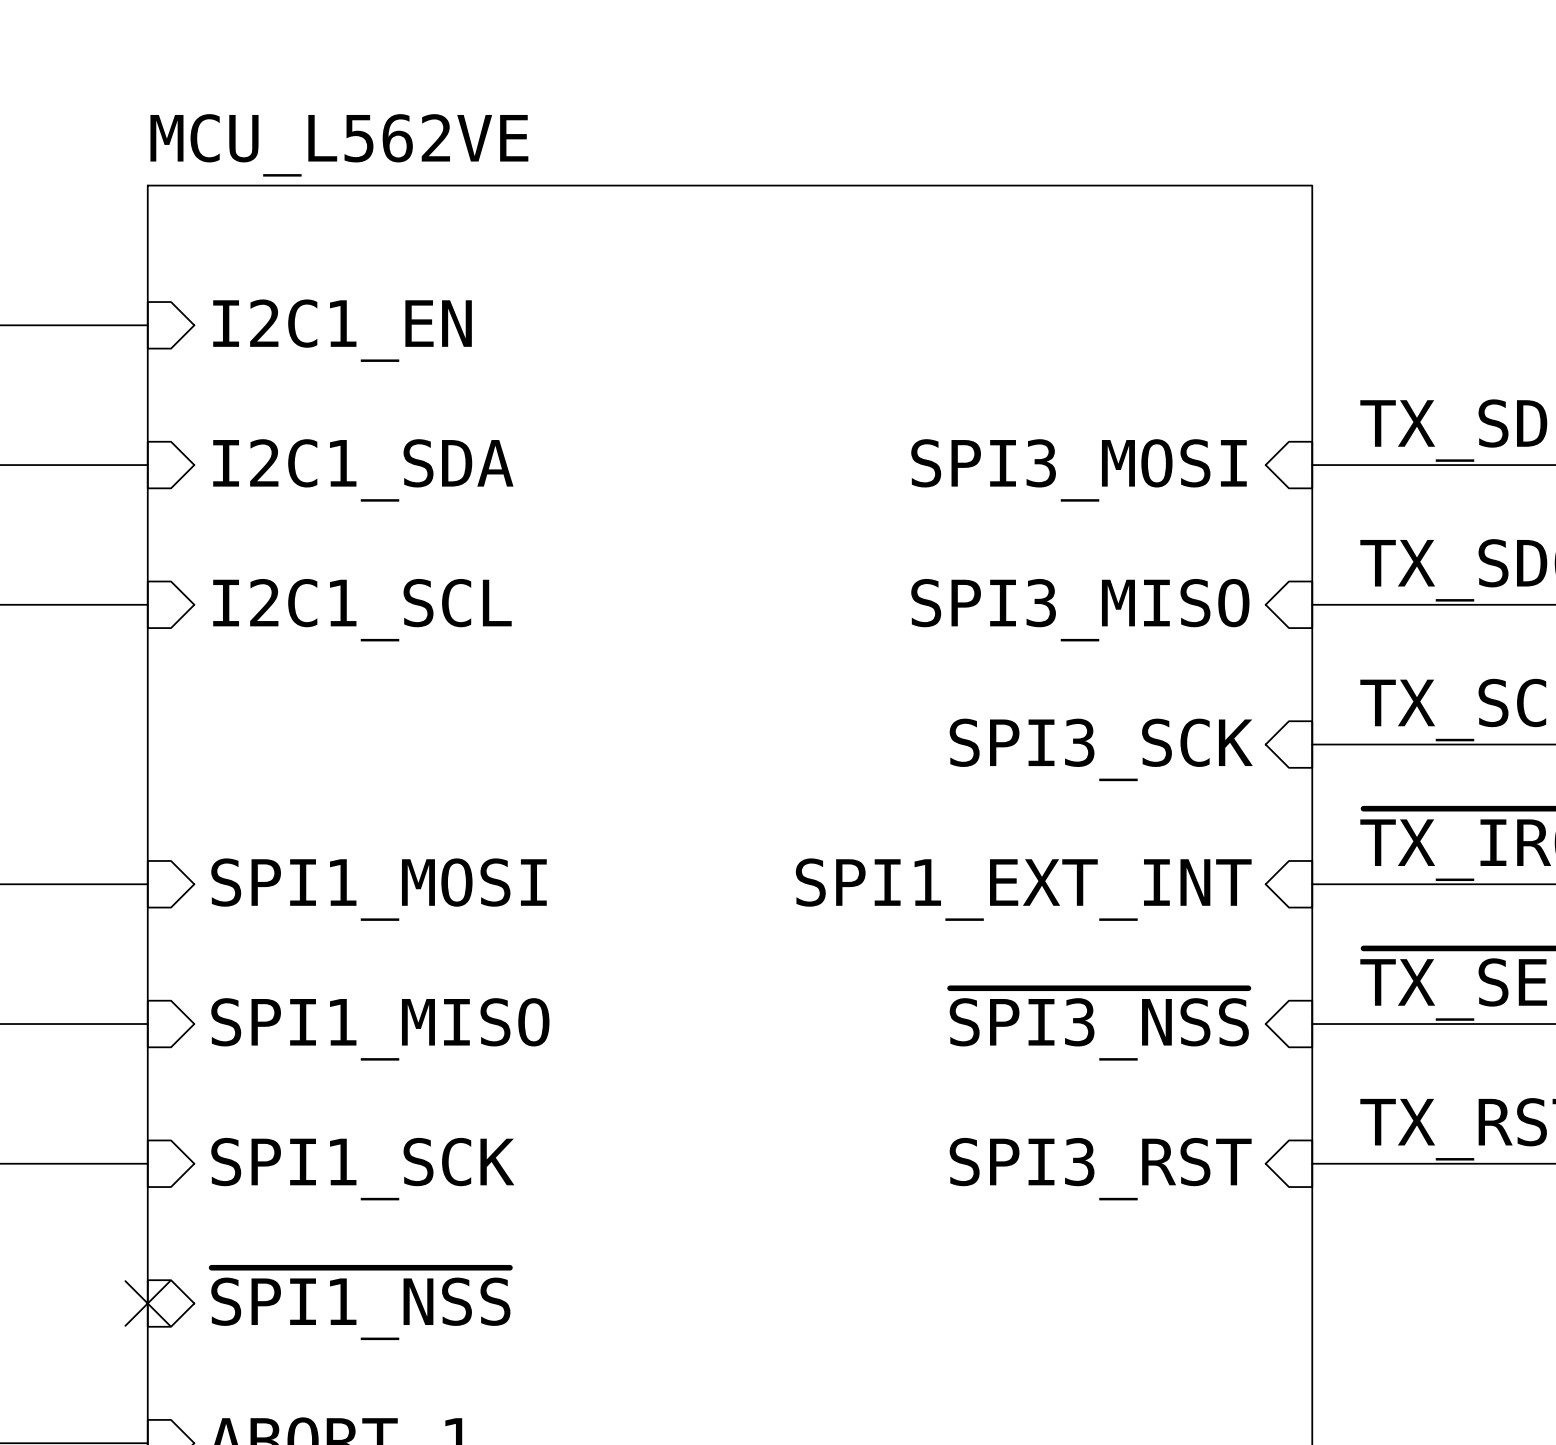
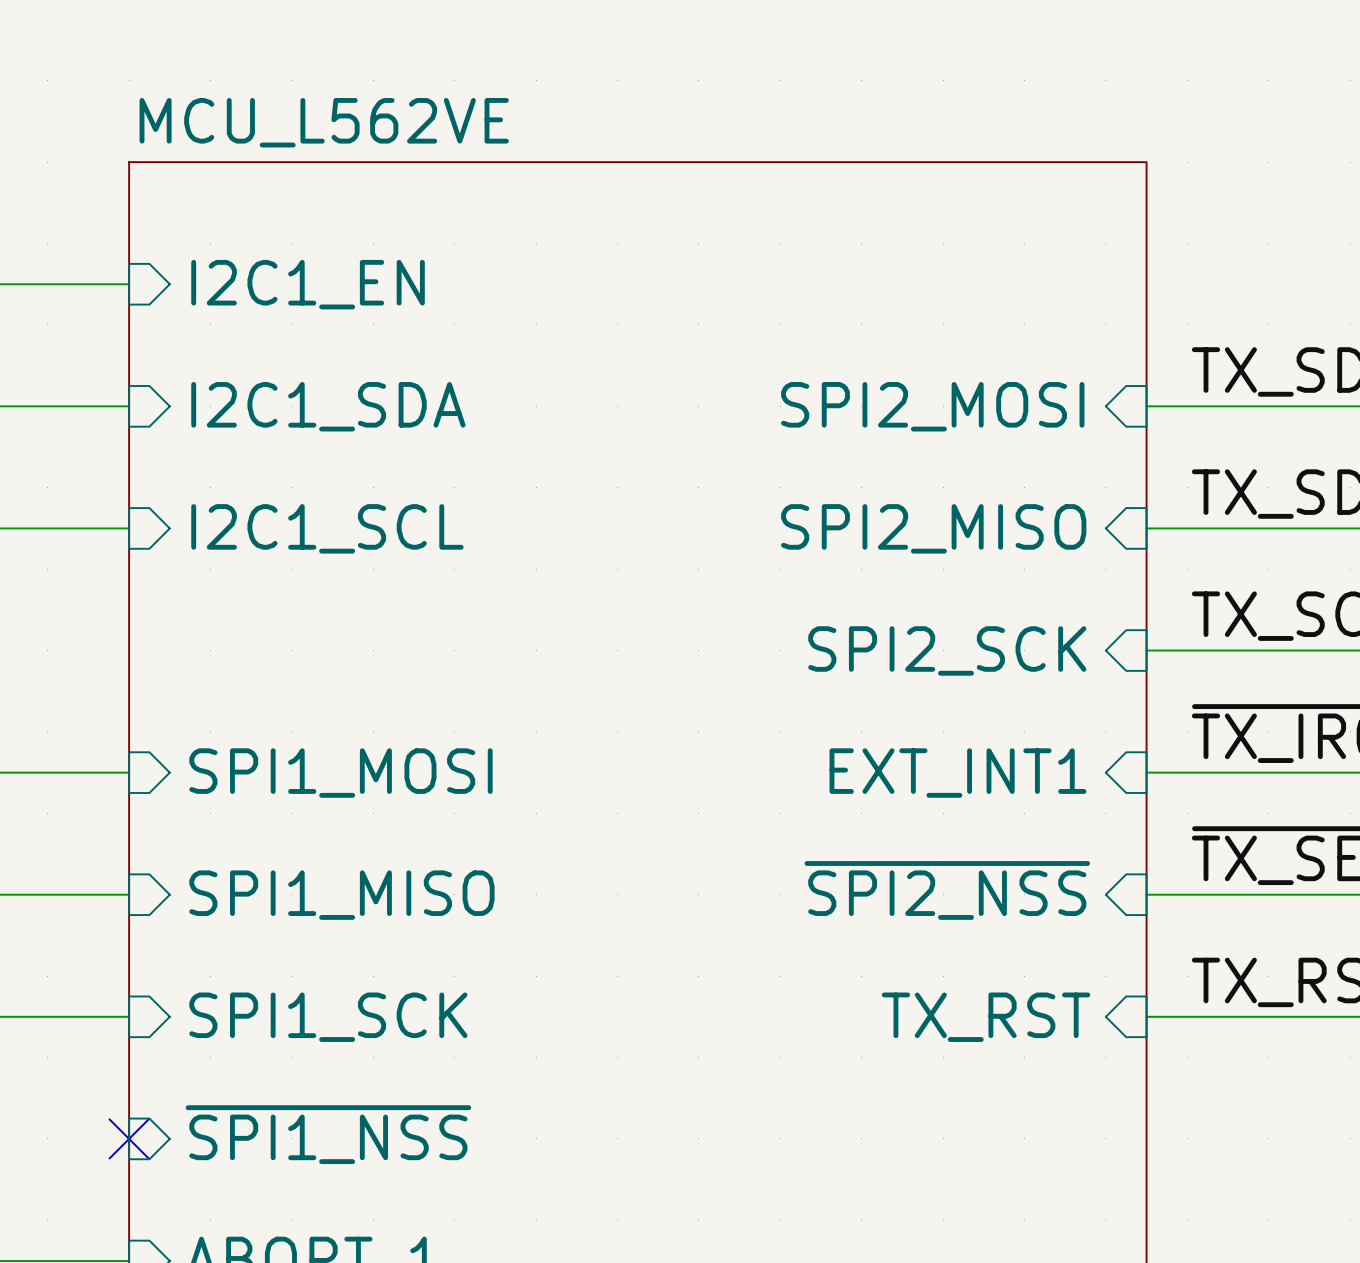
sheet pin: SPI3_MOSI (1079, 470) -> SPI2_MOSI (932, 406)
sheet pin: SPI3_MISO (1080, 610) -> SPI2_MISO (933, 528)
sheet pin: SPI3_SCK (1101, 749) -> SPI2_SCK (947, 650)
sheet pin: SPI1_EXT_INT (1023, 889) -> EXT_INT1 (957, 773)
sheet pin: ~{SPI3_NSS} (1099, 1024) -> ~{SPI2_NSS} (947, 890)
sheet pin: SPI3_RST (1100, 1169) -> TX_RST (986, 1017)

